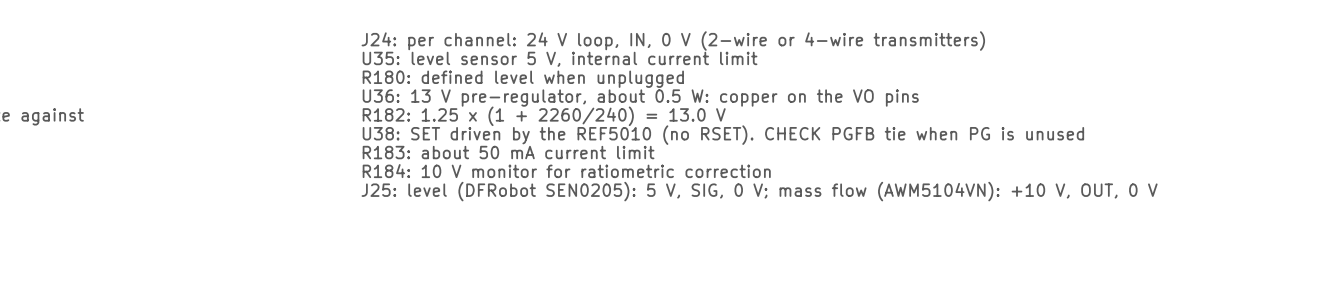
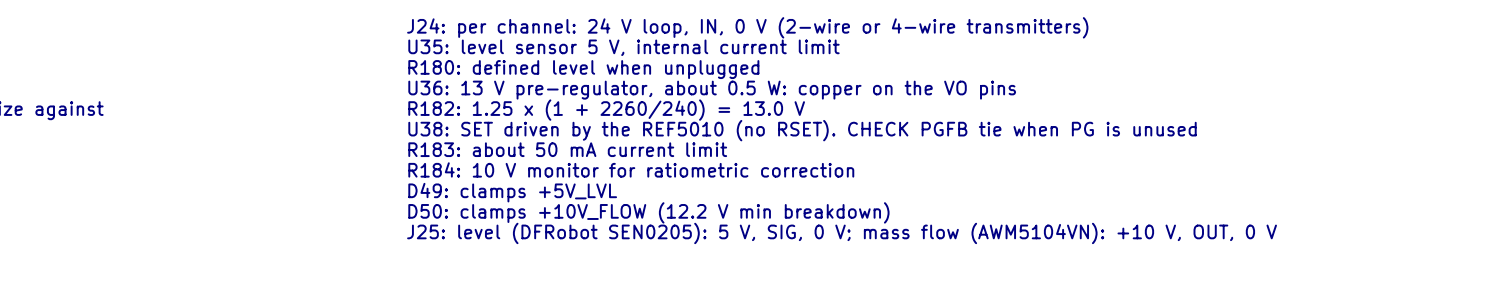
text: J25: level (DFRobot SEN0205): 5 V, SIG, 0 V; mass flow (AWM5104VN): +10 V, OUT, 0 V (759, 191) -> D49: clamps +5V_LVL (512, 192)
text: none -> D50: clamps +10V_FLOW (12.2 V min breakdown) (648, 212)
text: none -> J25: level (DFRobot SEN0205): 5 V, SIG, 0 V; mass flow (AWM5104VN): +10 V, OUT, 0 V (842, 233)

